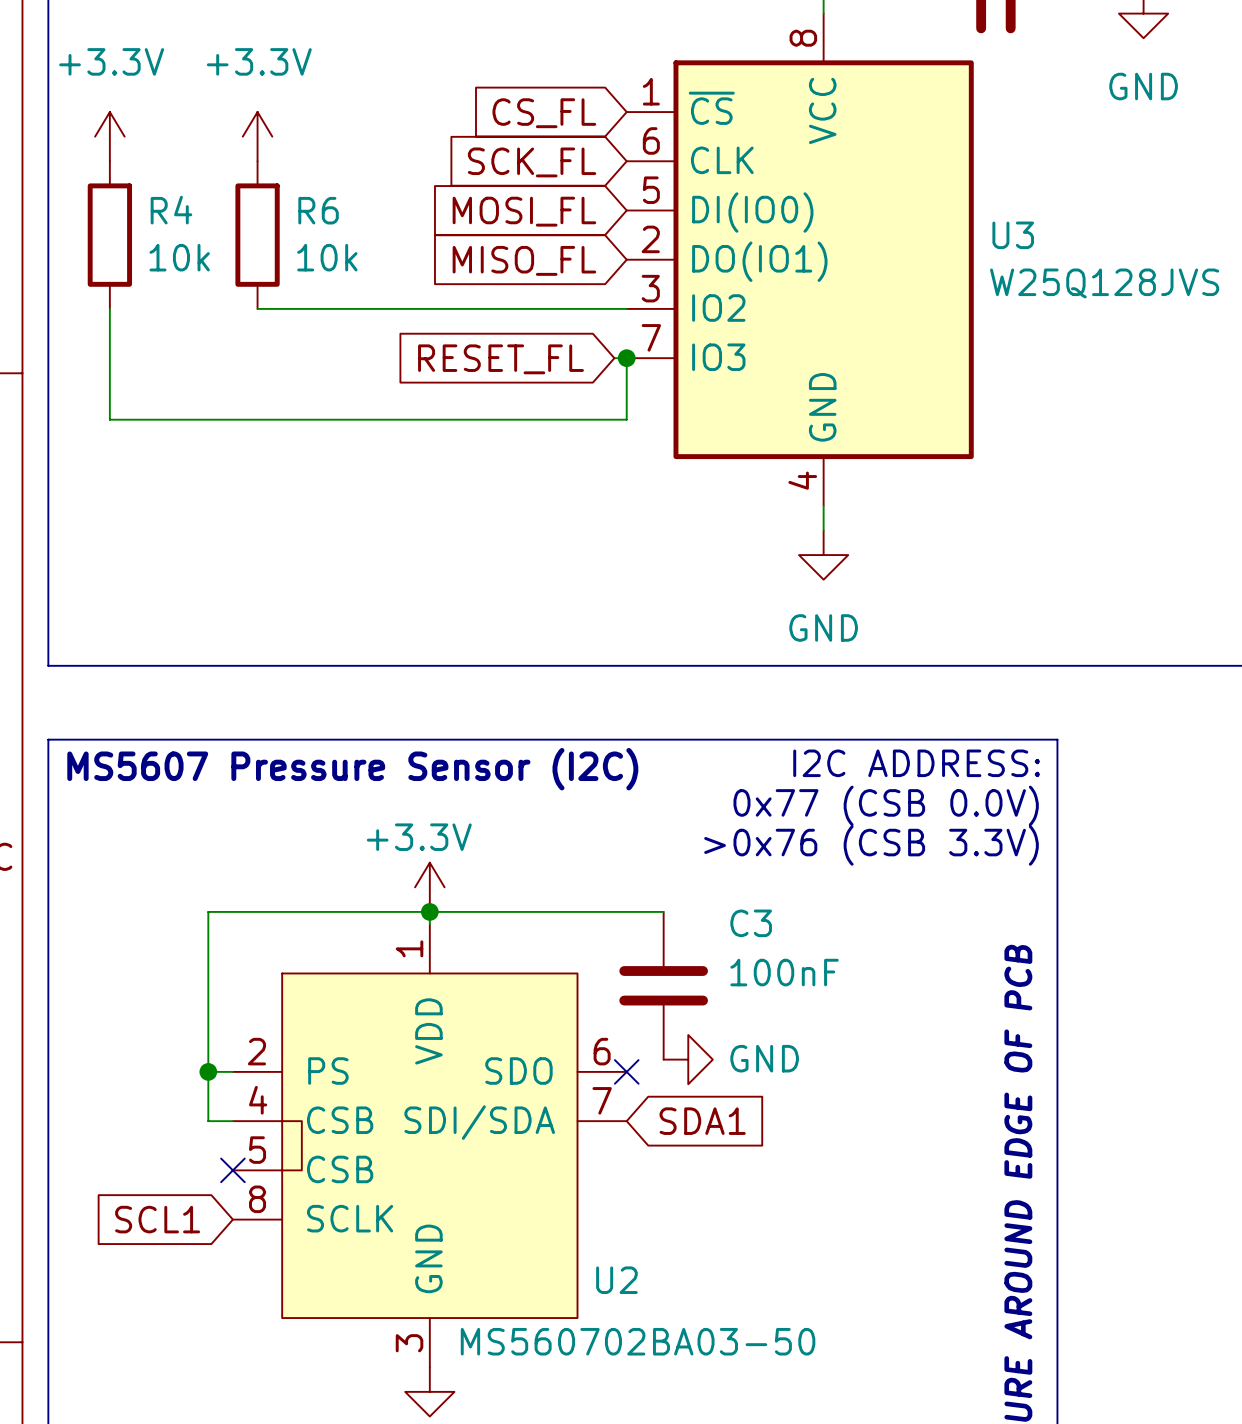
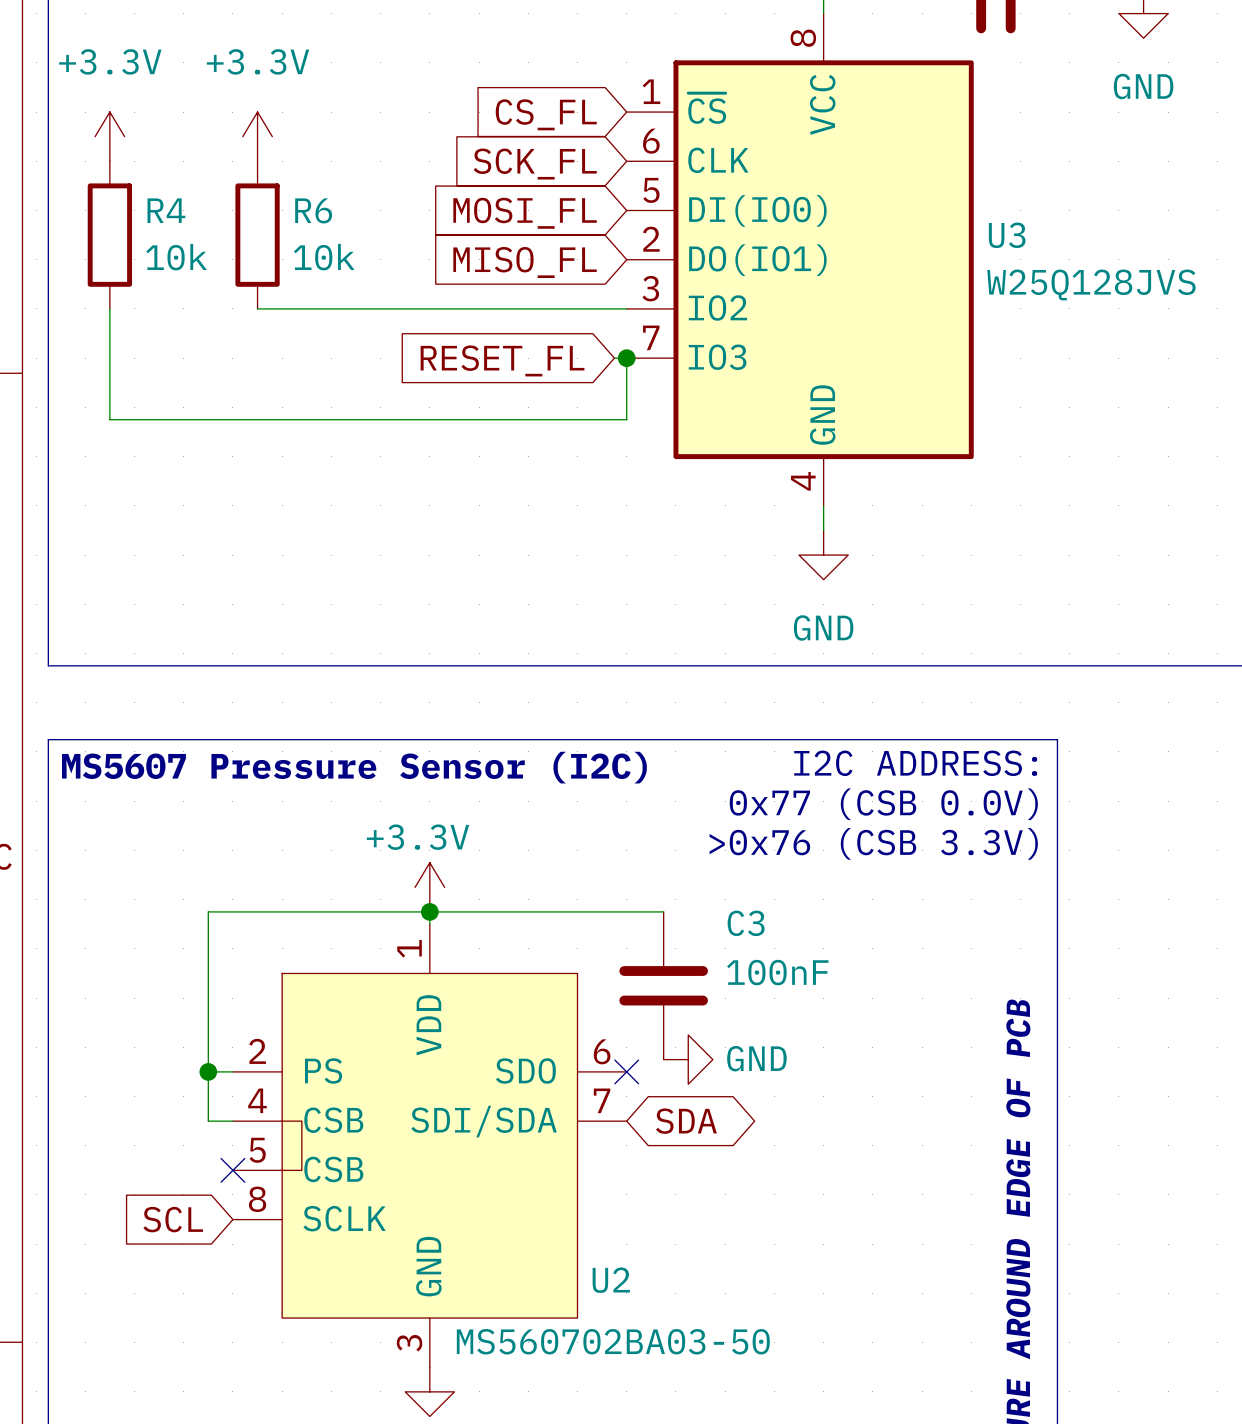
global label shape: input (702, 1121) -> bidirectional (686, 1121)
global label: SDA1 (702, 1121) -> SDA (686, 1121)
global label: SCL1 (157, 1219) -> SCL (173, 1219)

